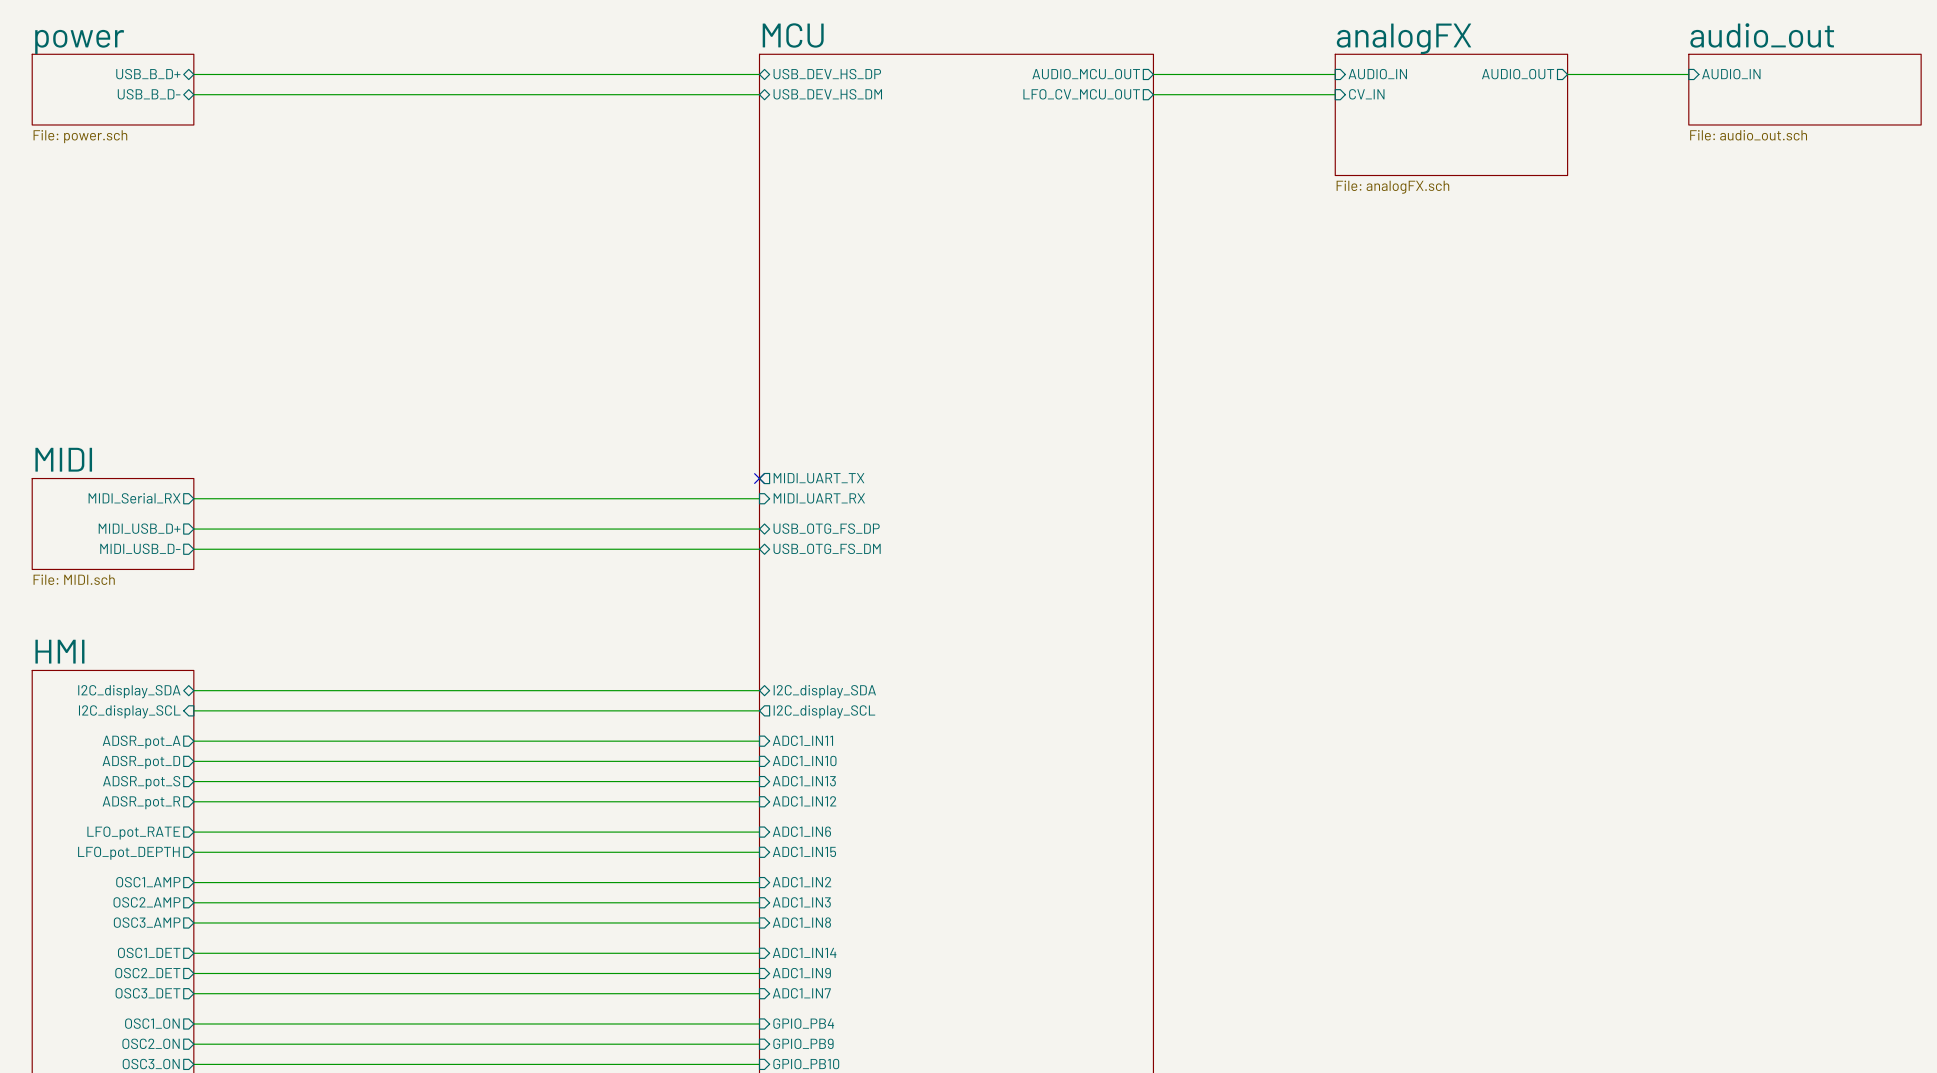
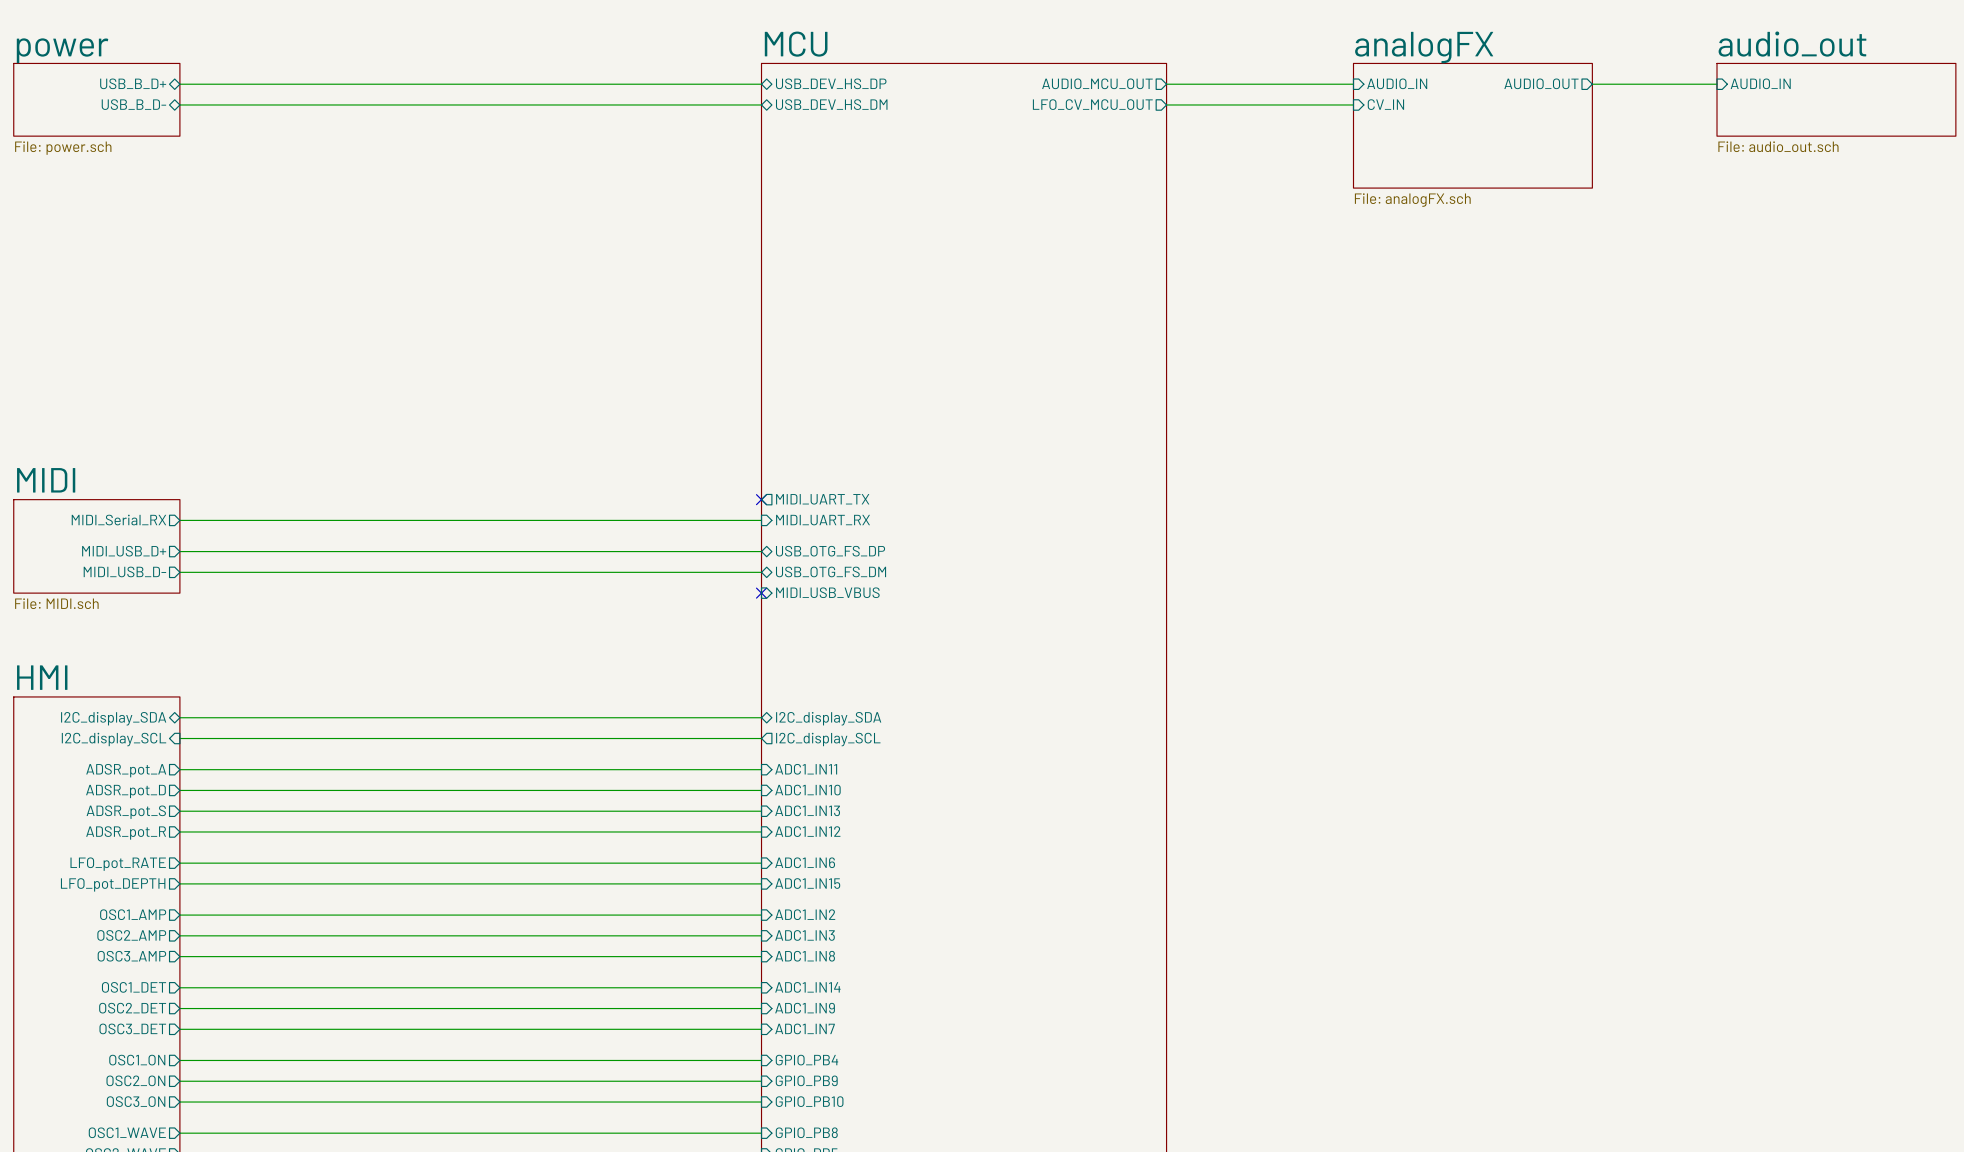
no-connect mark: none -> (761, 593)
sheet pin: none -> MIDI_USB_VBUS (827, 592)

